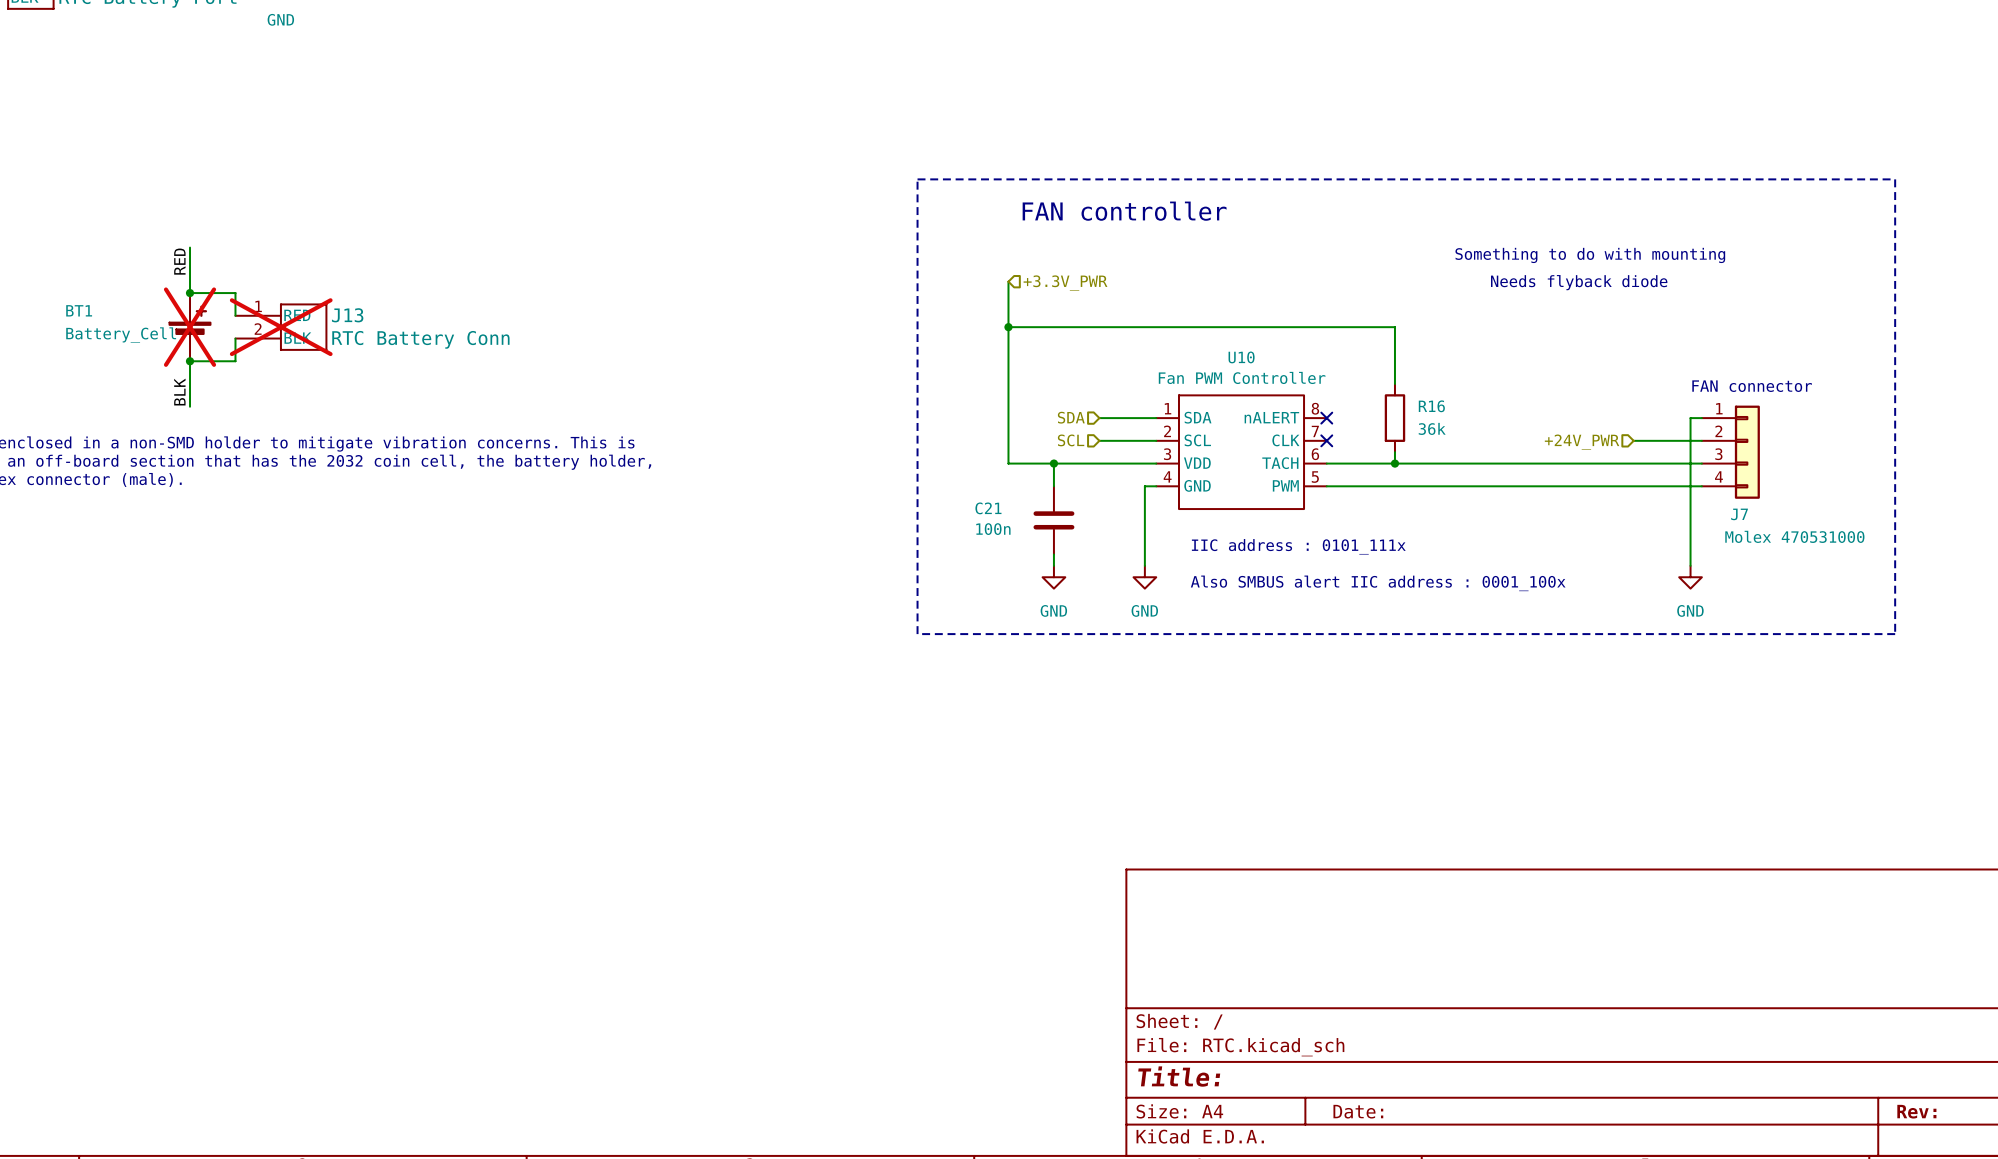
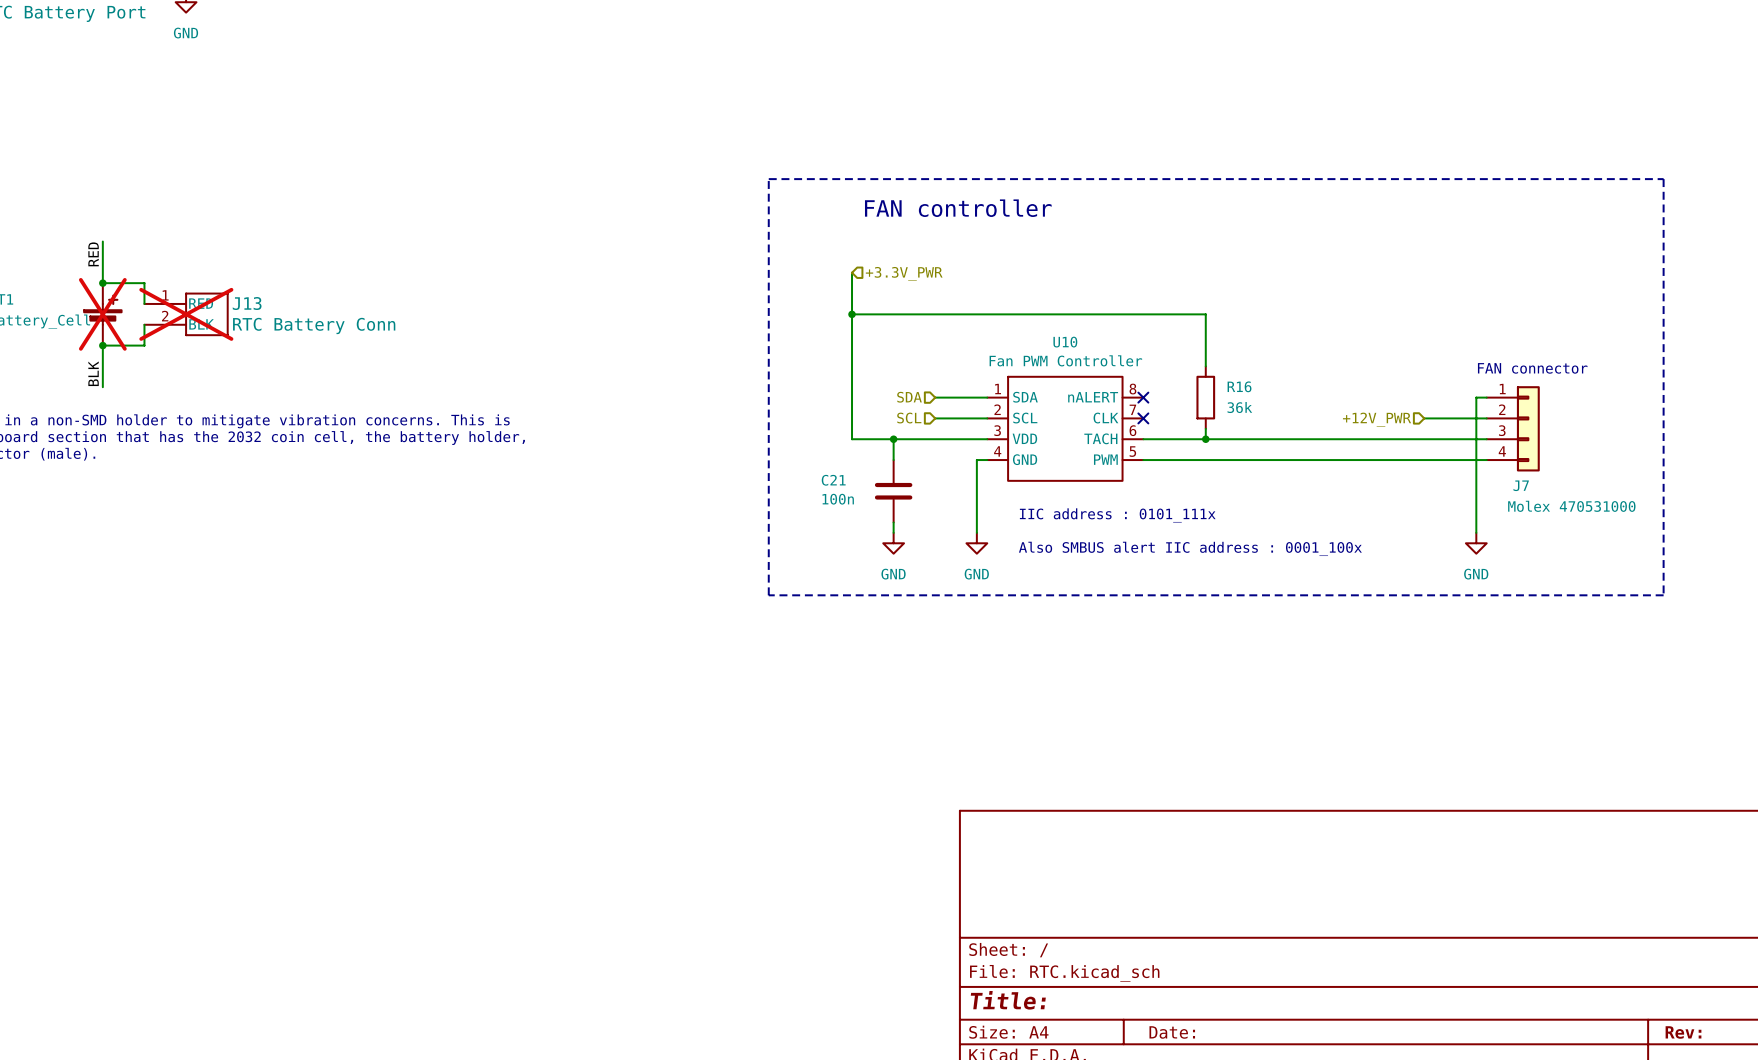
text: Something to do with mounting (1590, 255) -> none
text: Needs flyback diode (1579, 282) -> none
hierarchical label: +24V_PWR (1582, 442) -> +12V_PWR (1377, 419)

